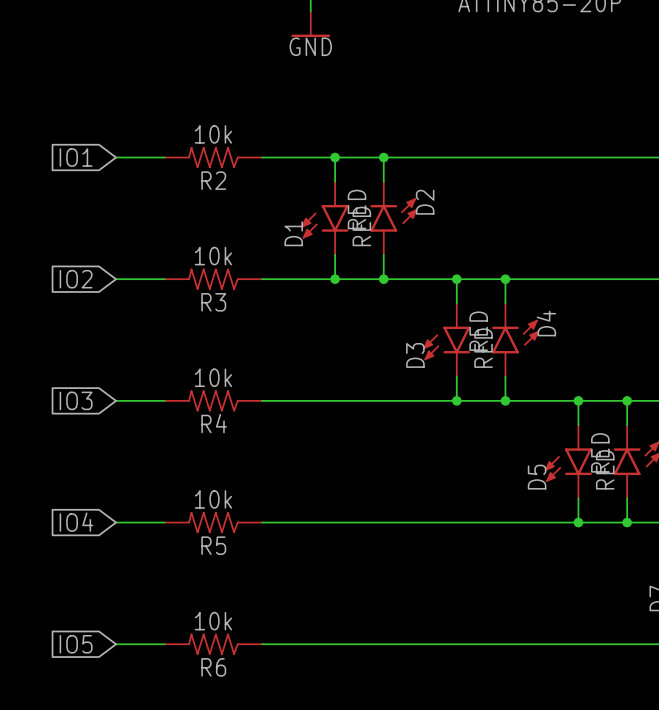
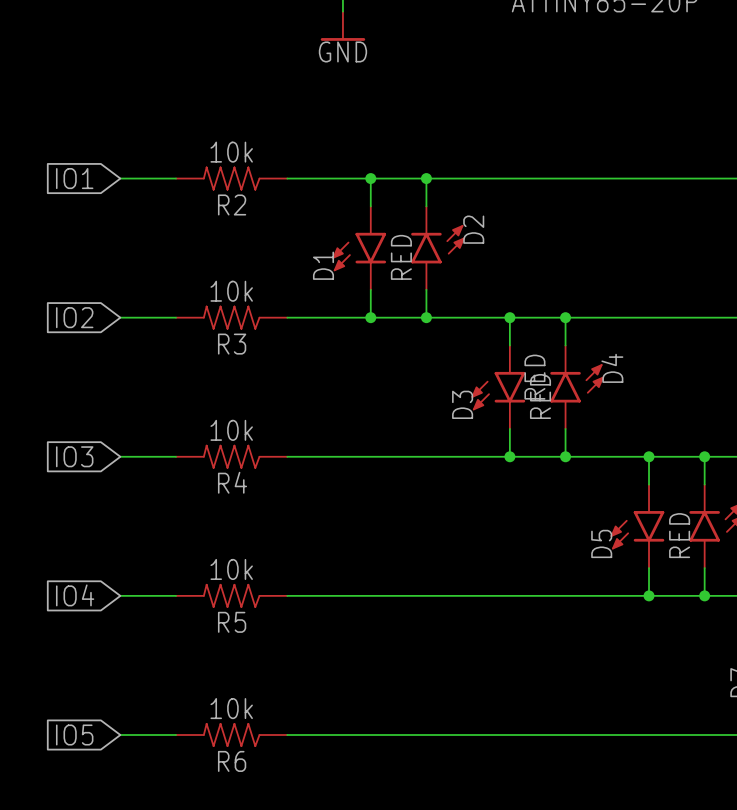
D2 value: RED (356, 209) -> none
part value: RED (600, 452) -> none

